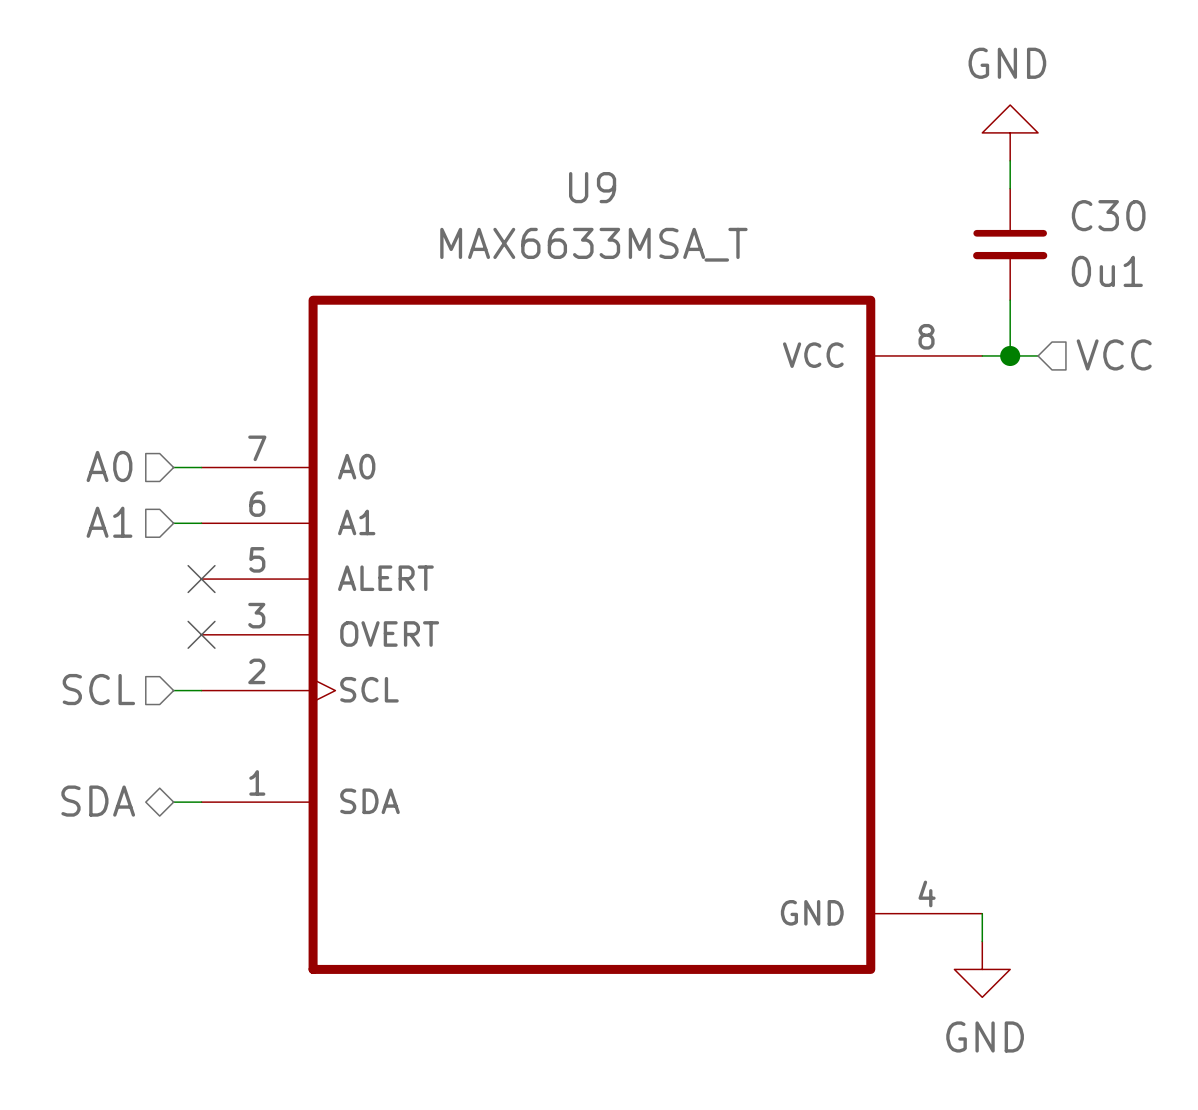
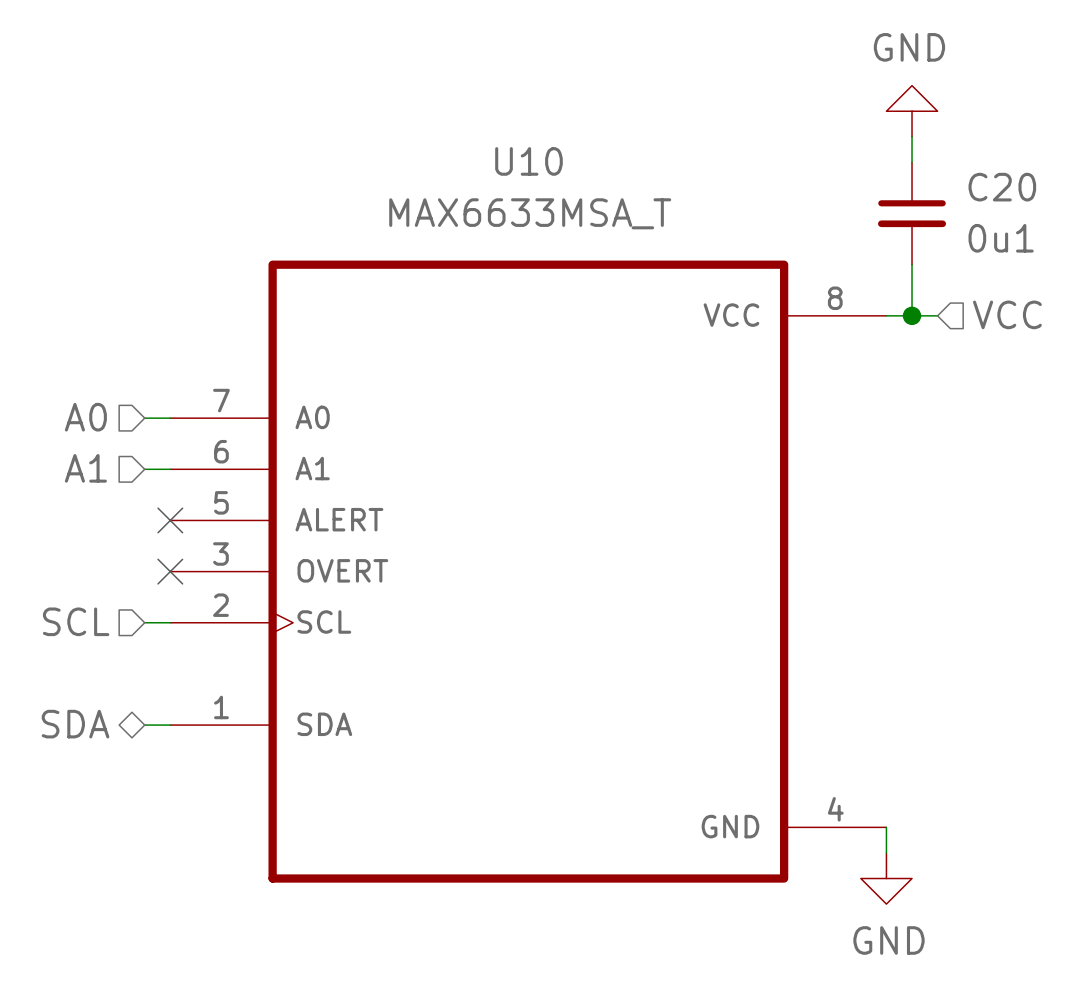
U9 name: U9 (592, 187) -> U10 (528, 161)
C30 name: C30 (1108, 215) -> C20 (1002, 187)

